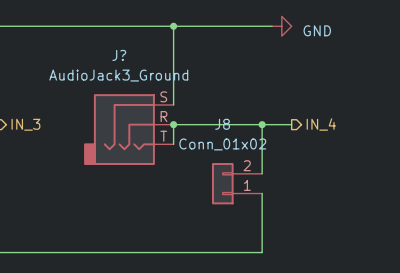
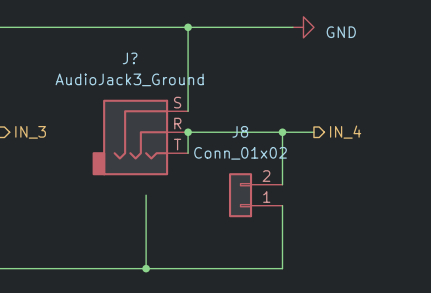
wire: none -> (146, 195) (146, 268)
junction: none -> (146, 268)

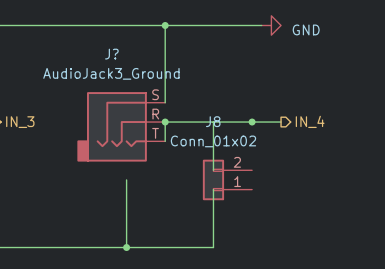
wire: (282, 132) (282, 184) -> (213, 122) (213, 170)
wire: (282, 205) (282, 268) (240, 268) -> (213, 189) (213, 247)

